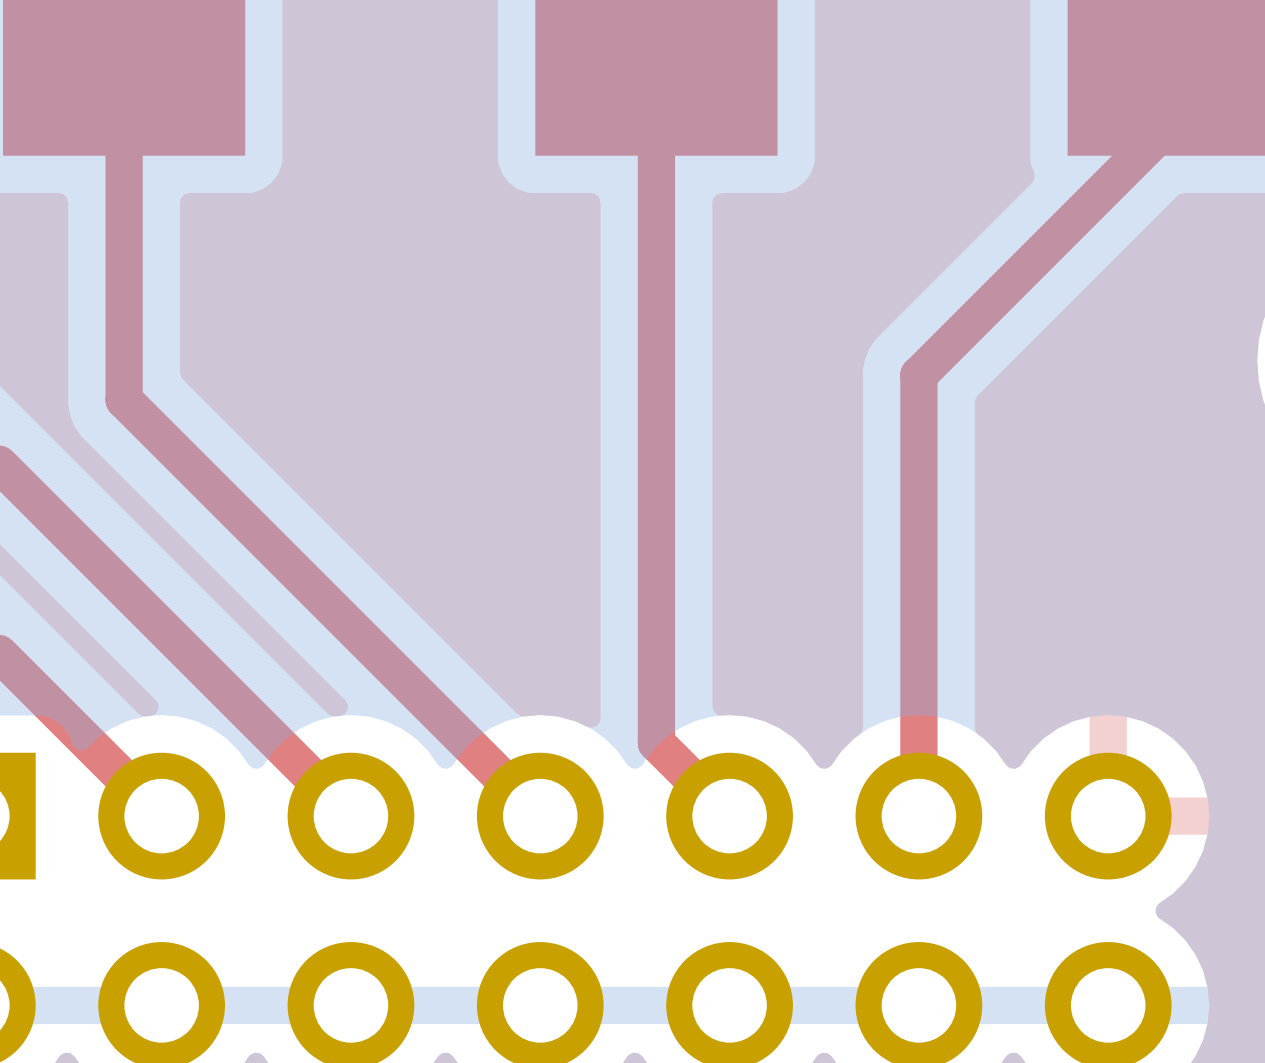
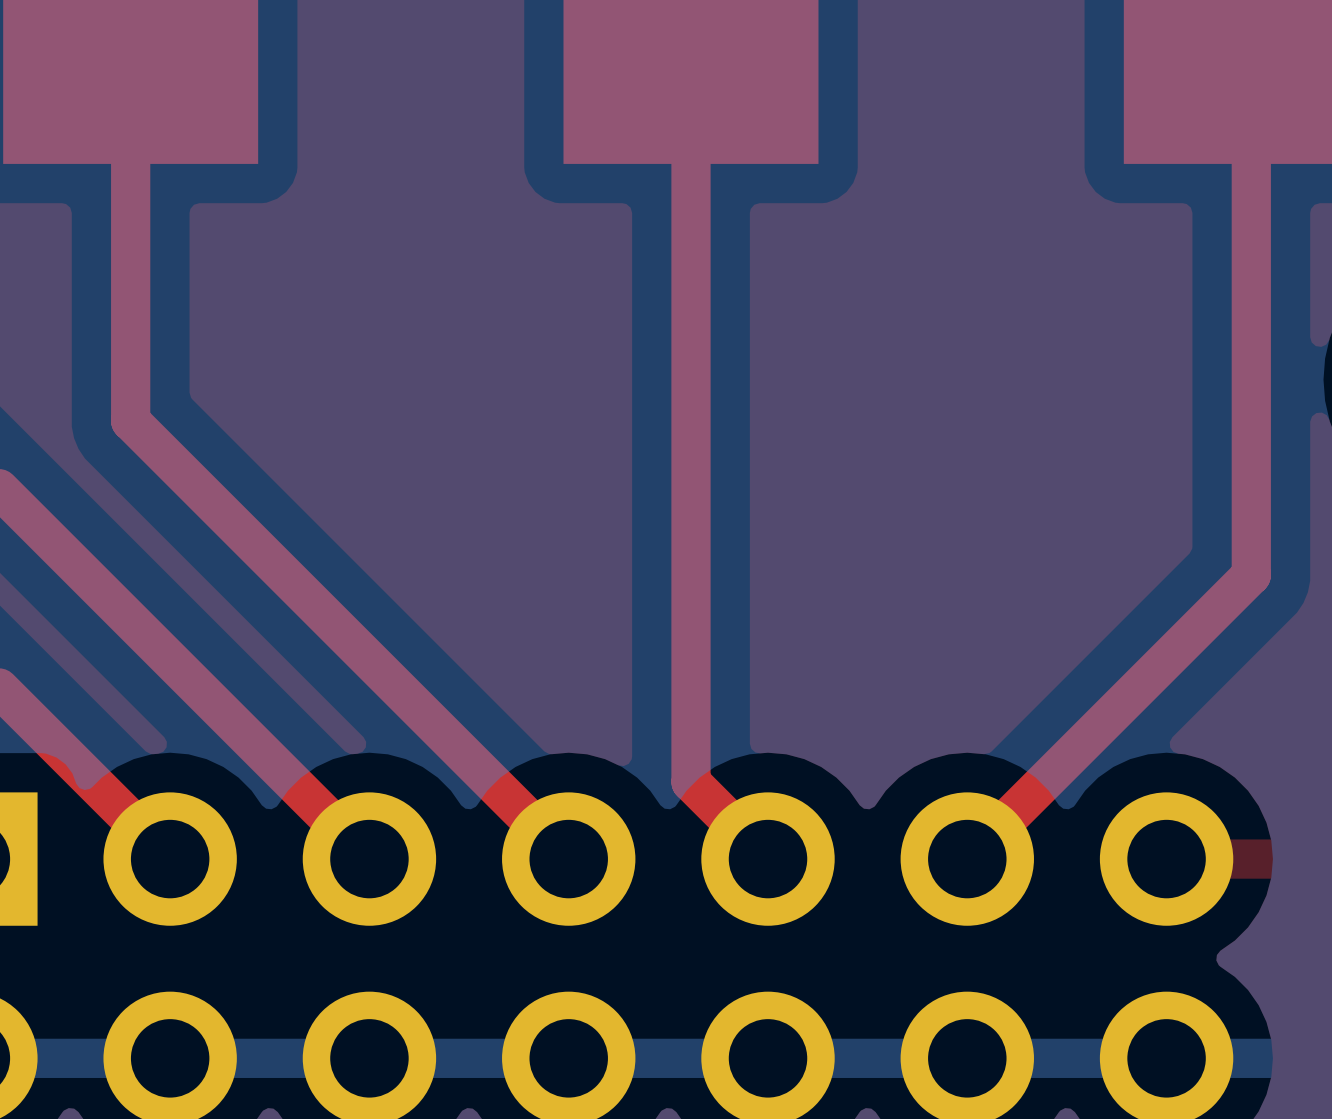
top track: (1188, 105) (918, 375) (918, 816) -> (1251, 110) (1251, 575) (967, 859)

